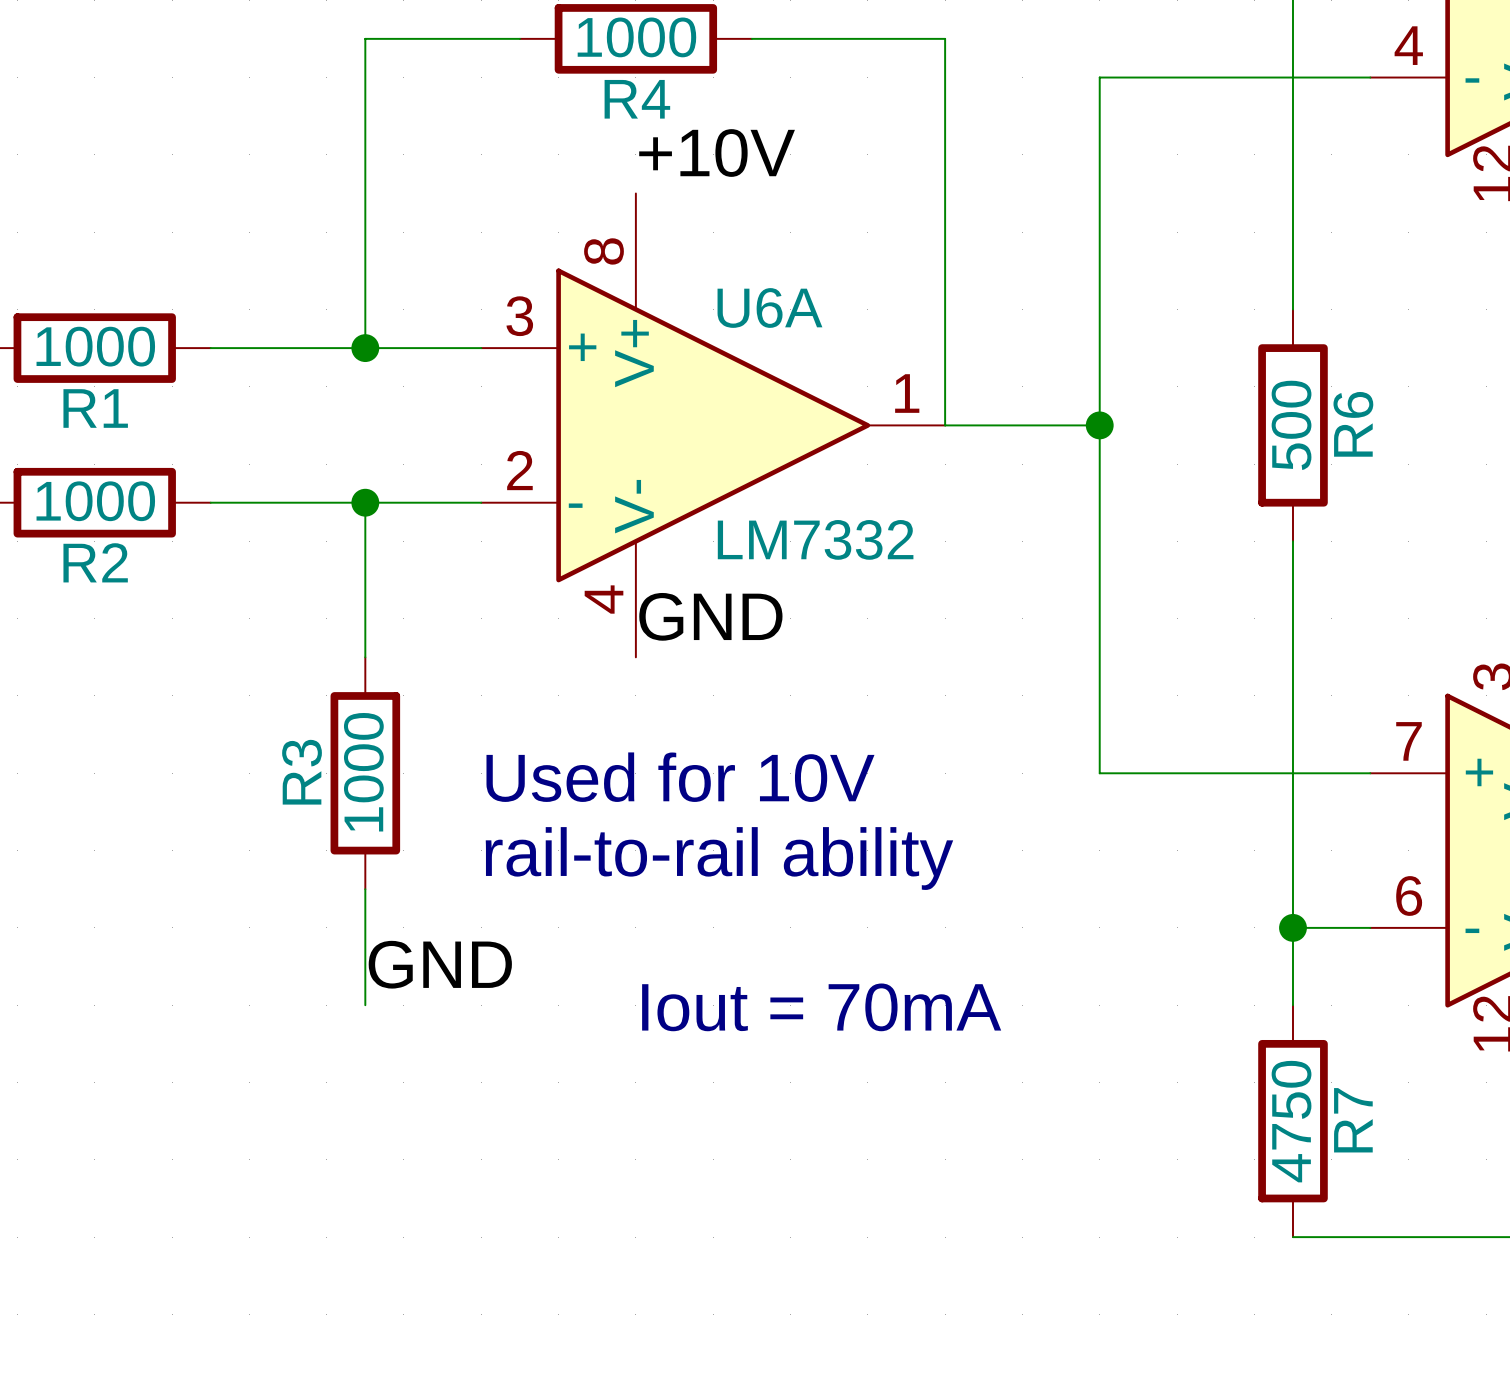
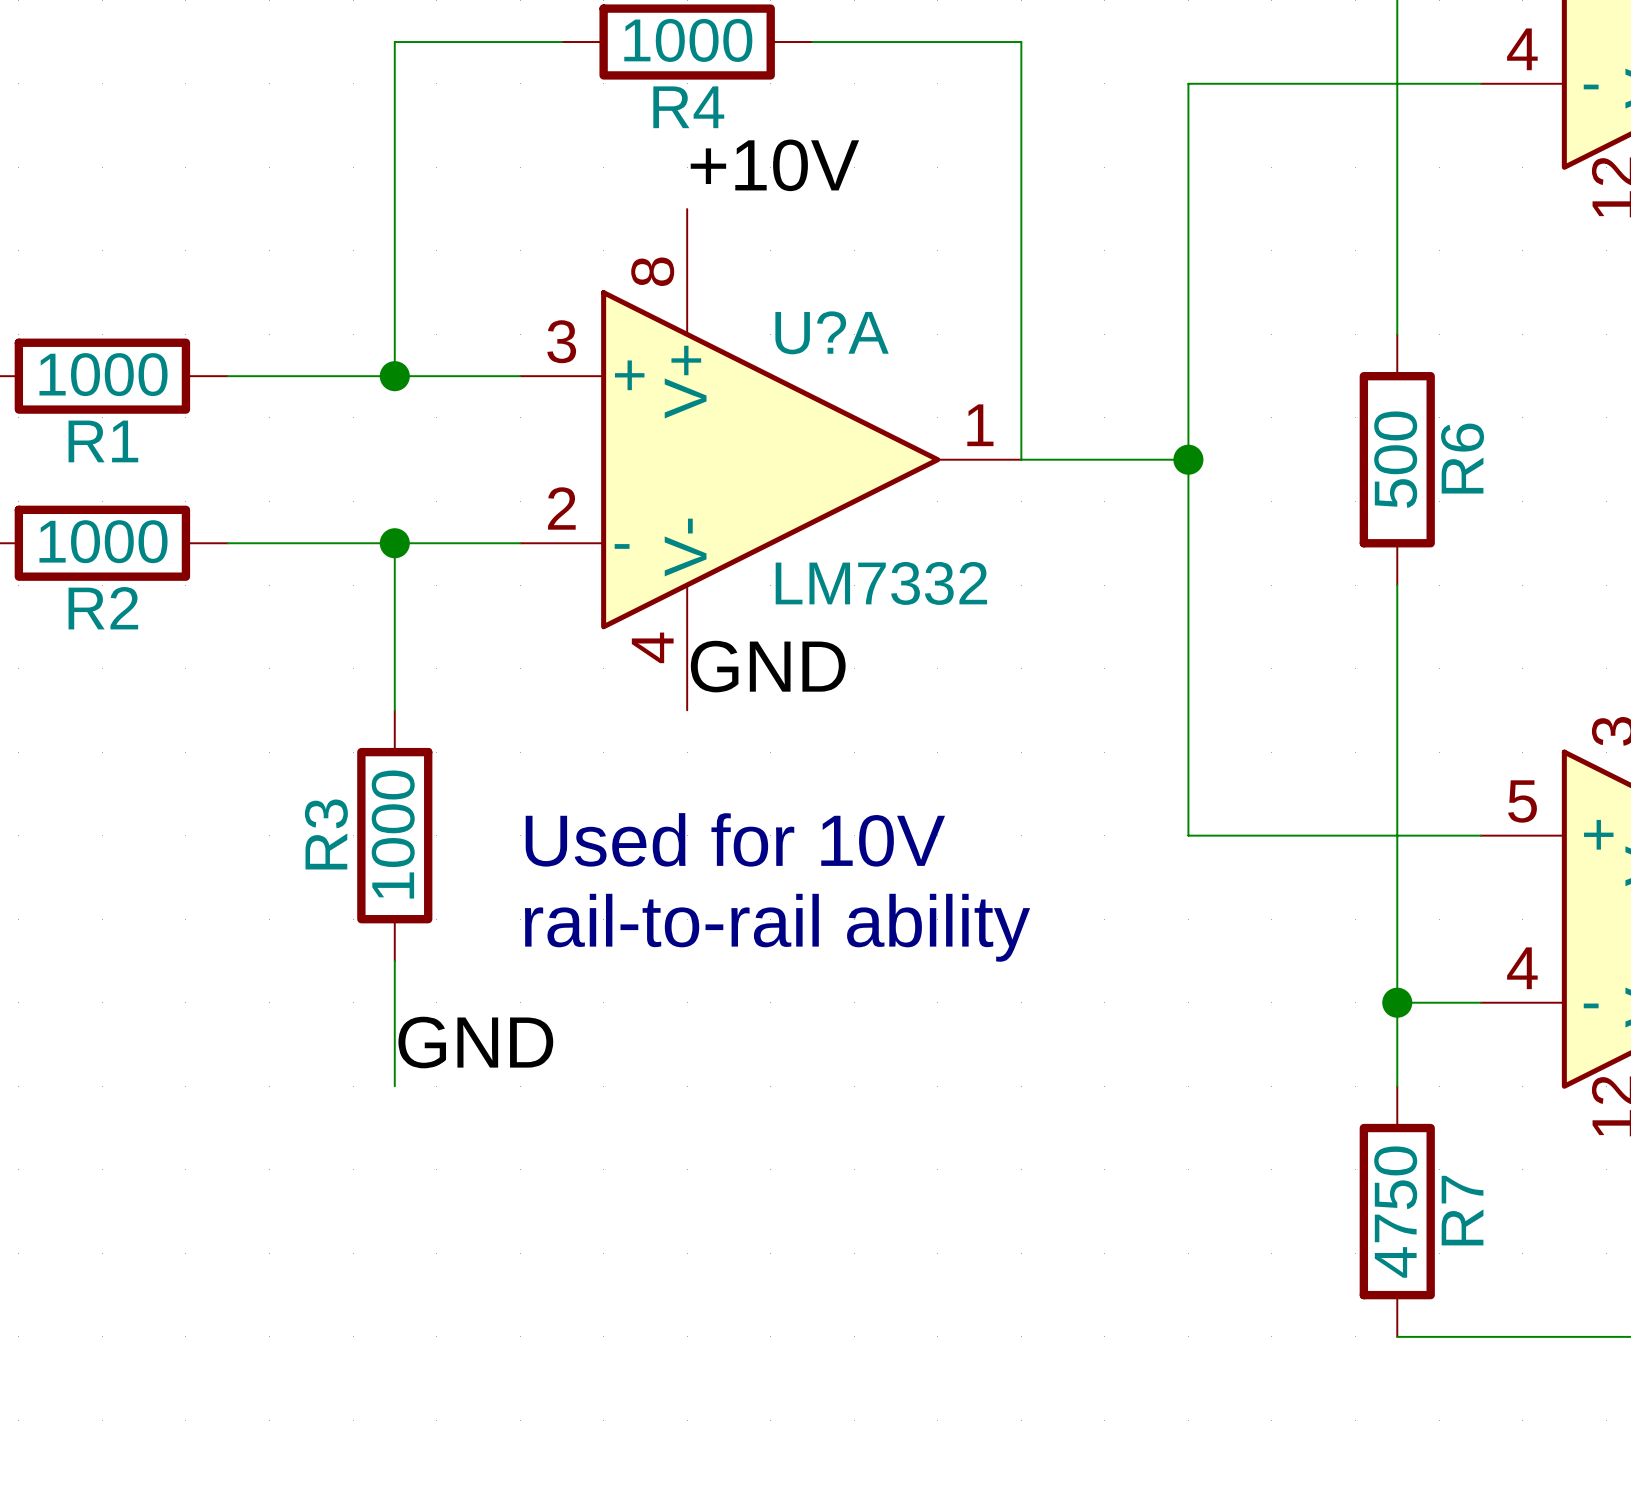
U6A name: U6A (769, 307) -> U?A (832, 332)
part pin number: 7 (1408, 741) -> 5 (1522, 801)
part pin number: 6 (1409, 895) -> 4 (1522, 968)
text: Iout = 70mA (821, 1007) -> none

